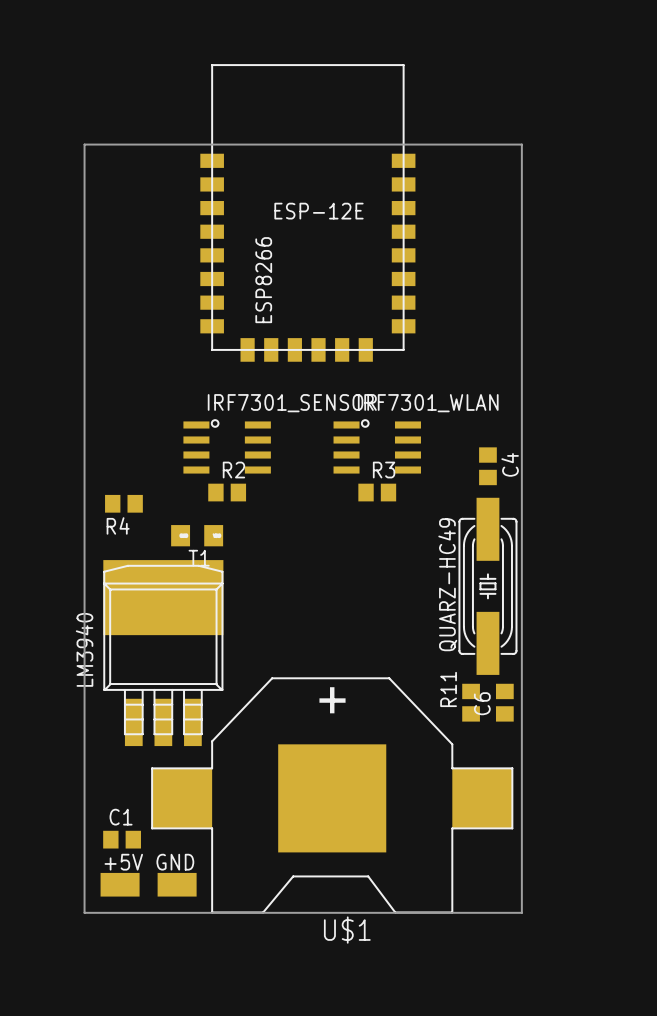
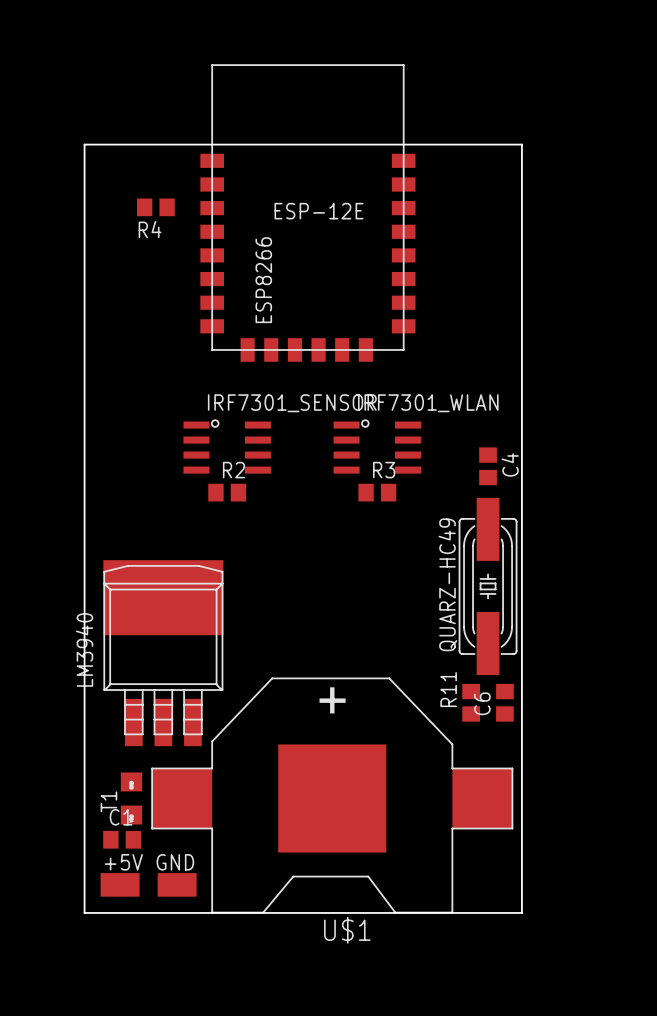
R4 position: (123, 503) -> (155, 207)
T1 rotation: 0° (197, 535) -> 90° clockwise (131, 798)
T1 position: (197, 535) -> (131, 798)

